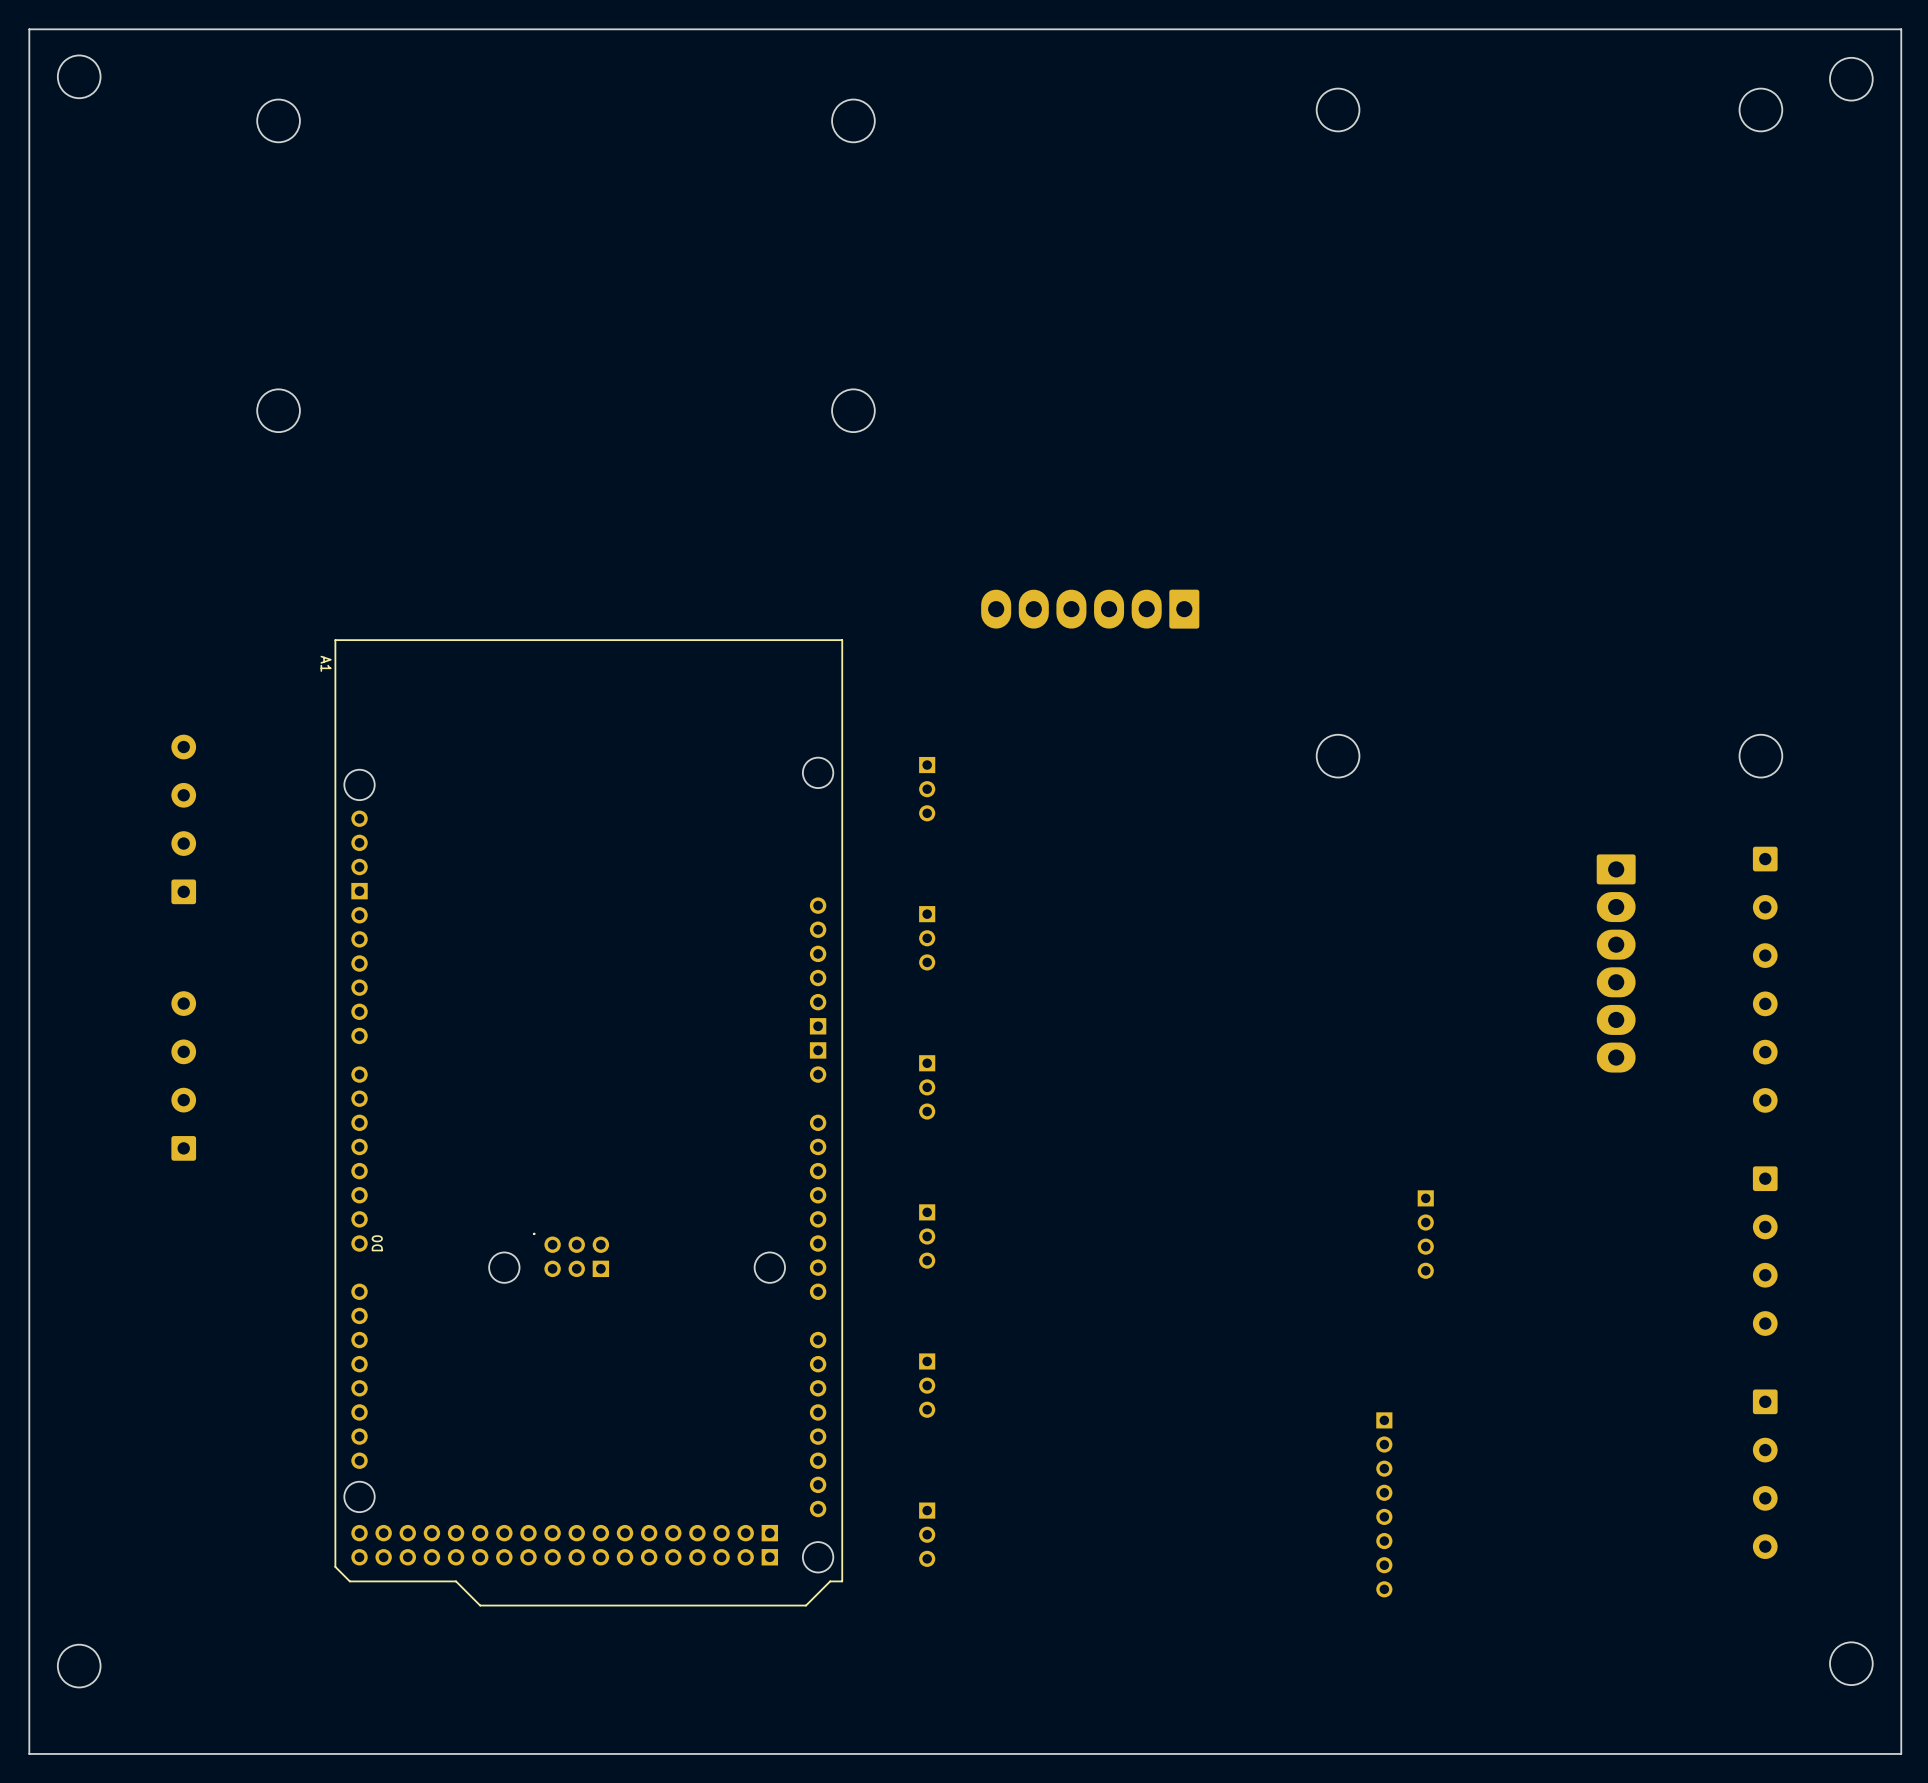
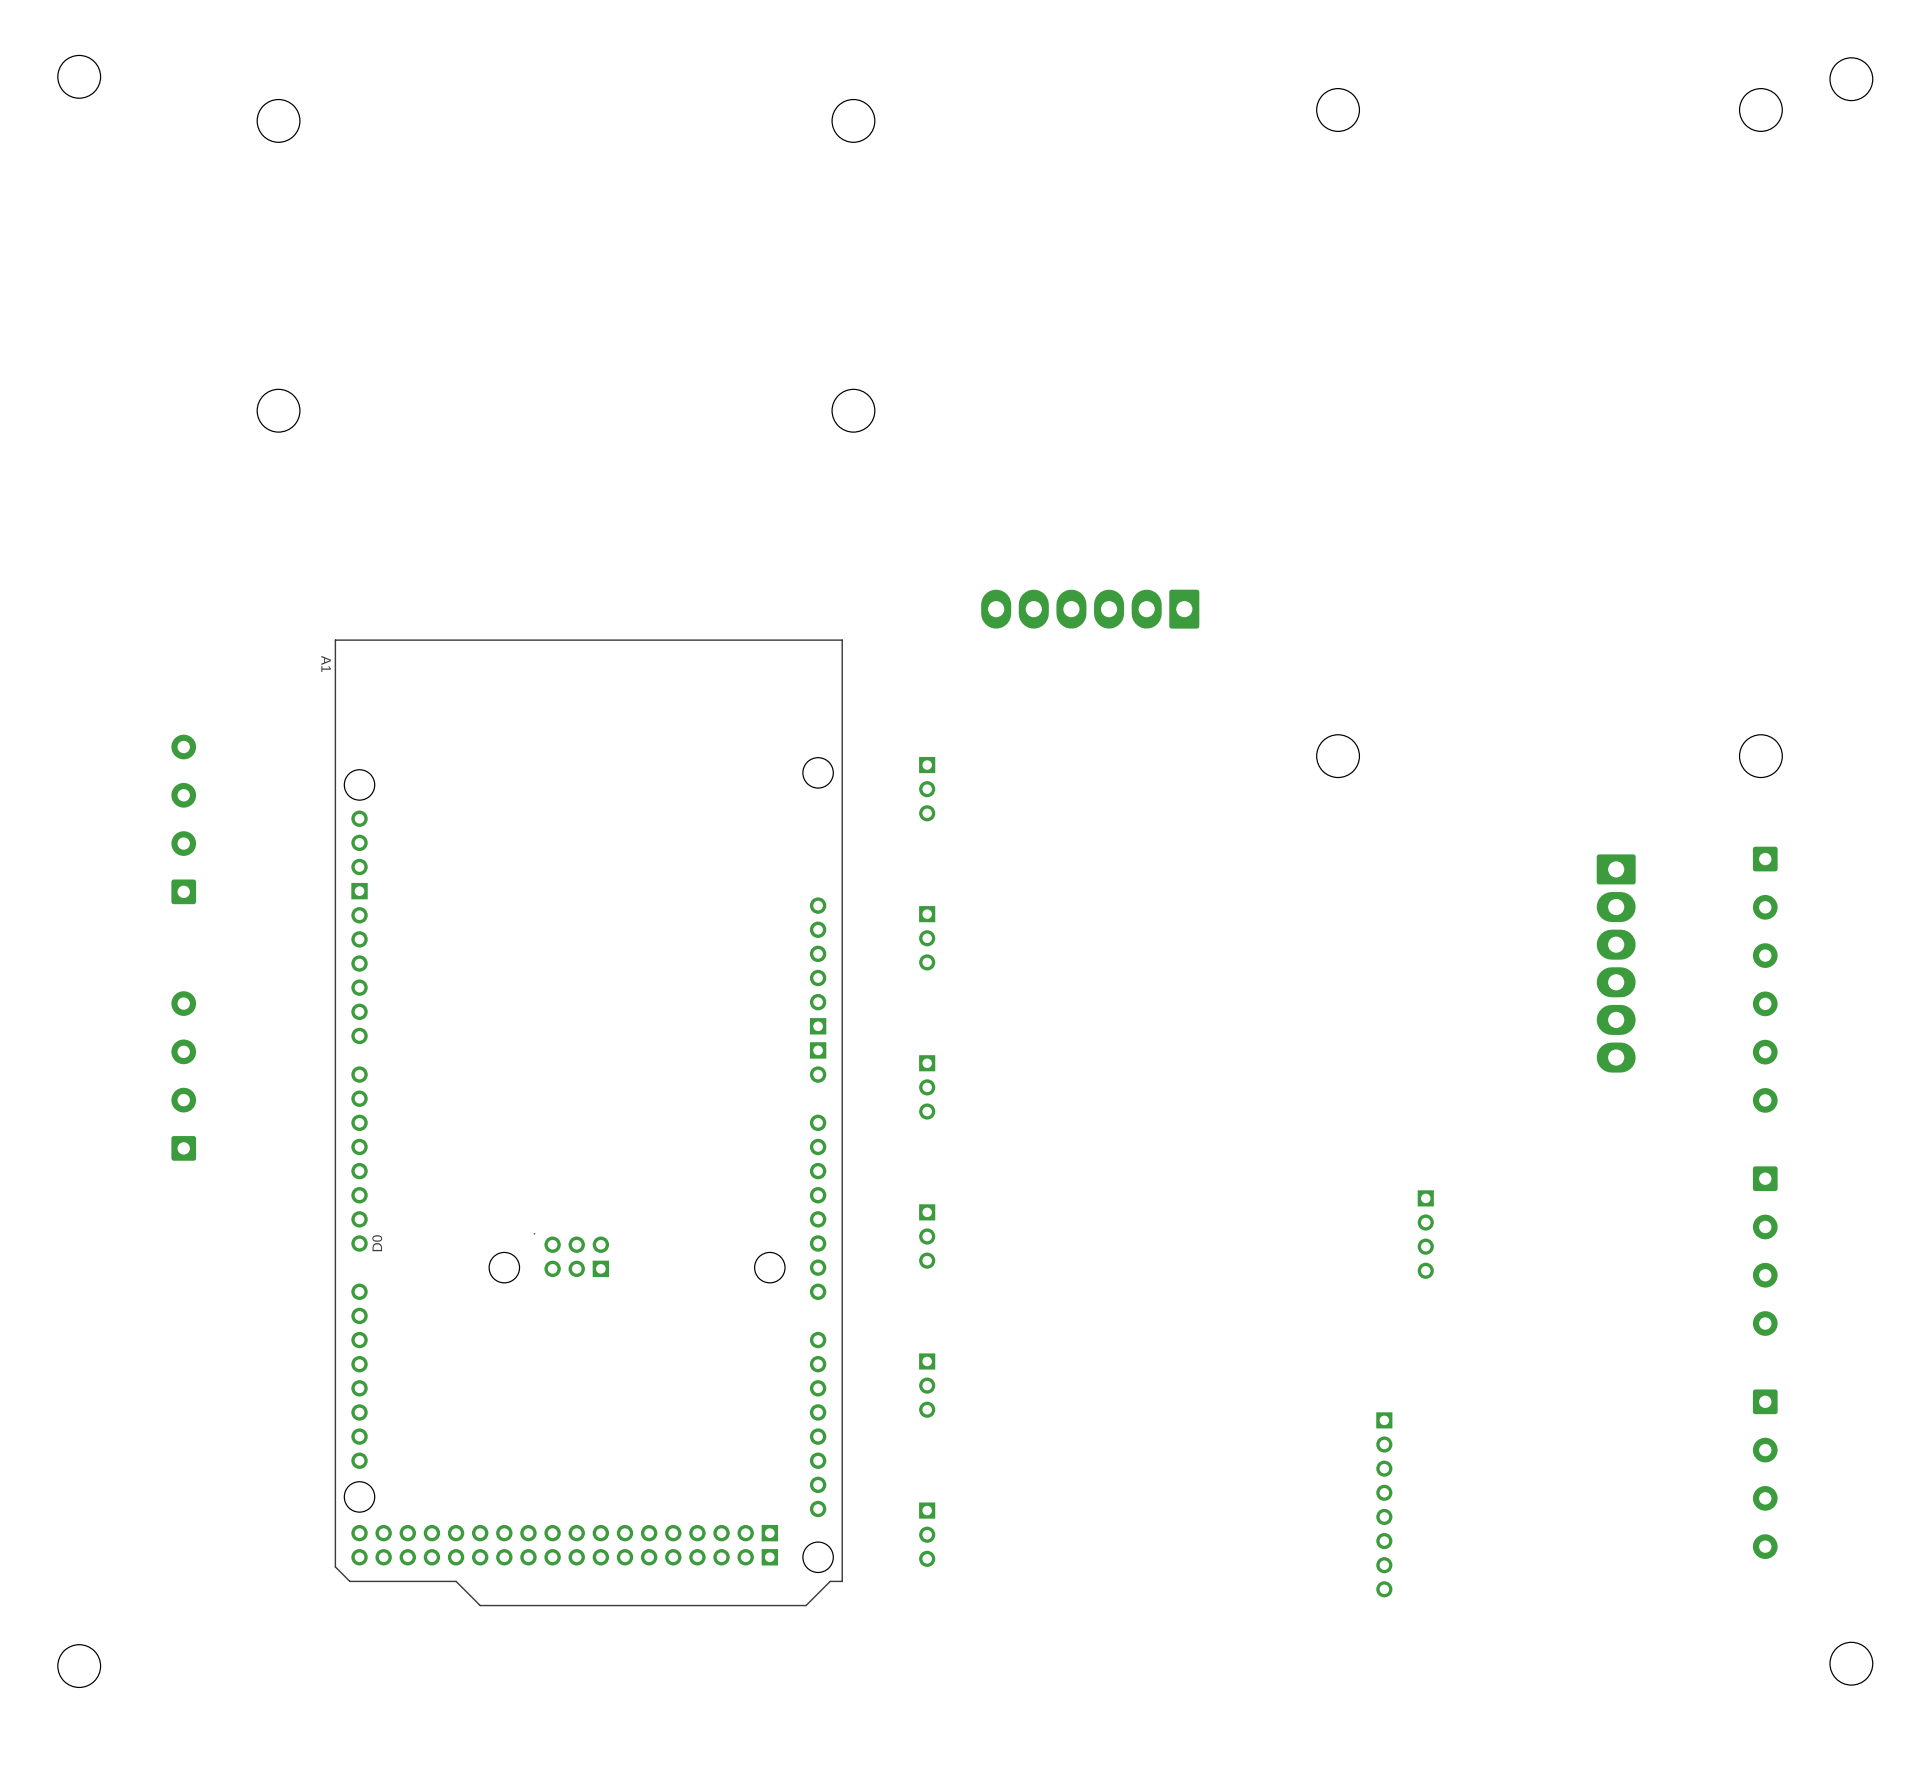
board edge: (1901, 29) (29, 29) (29, 1753) (1901, 1753) (1901, 29) -> none

